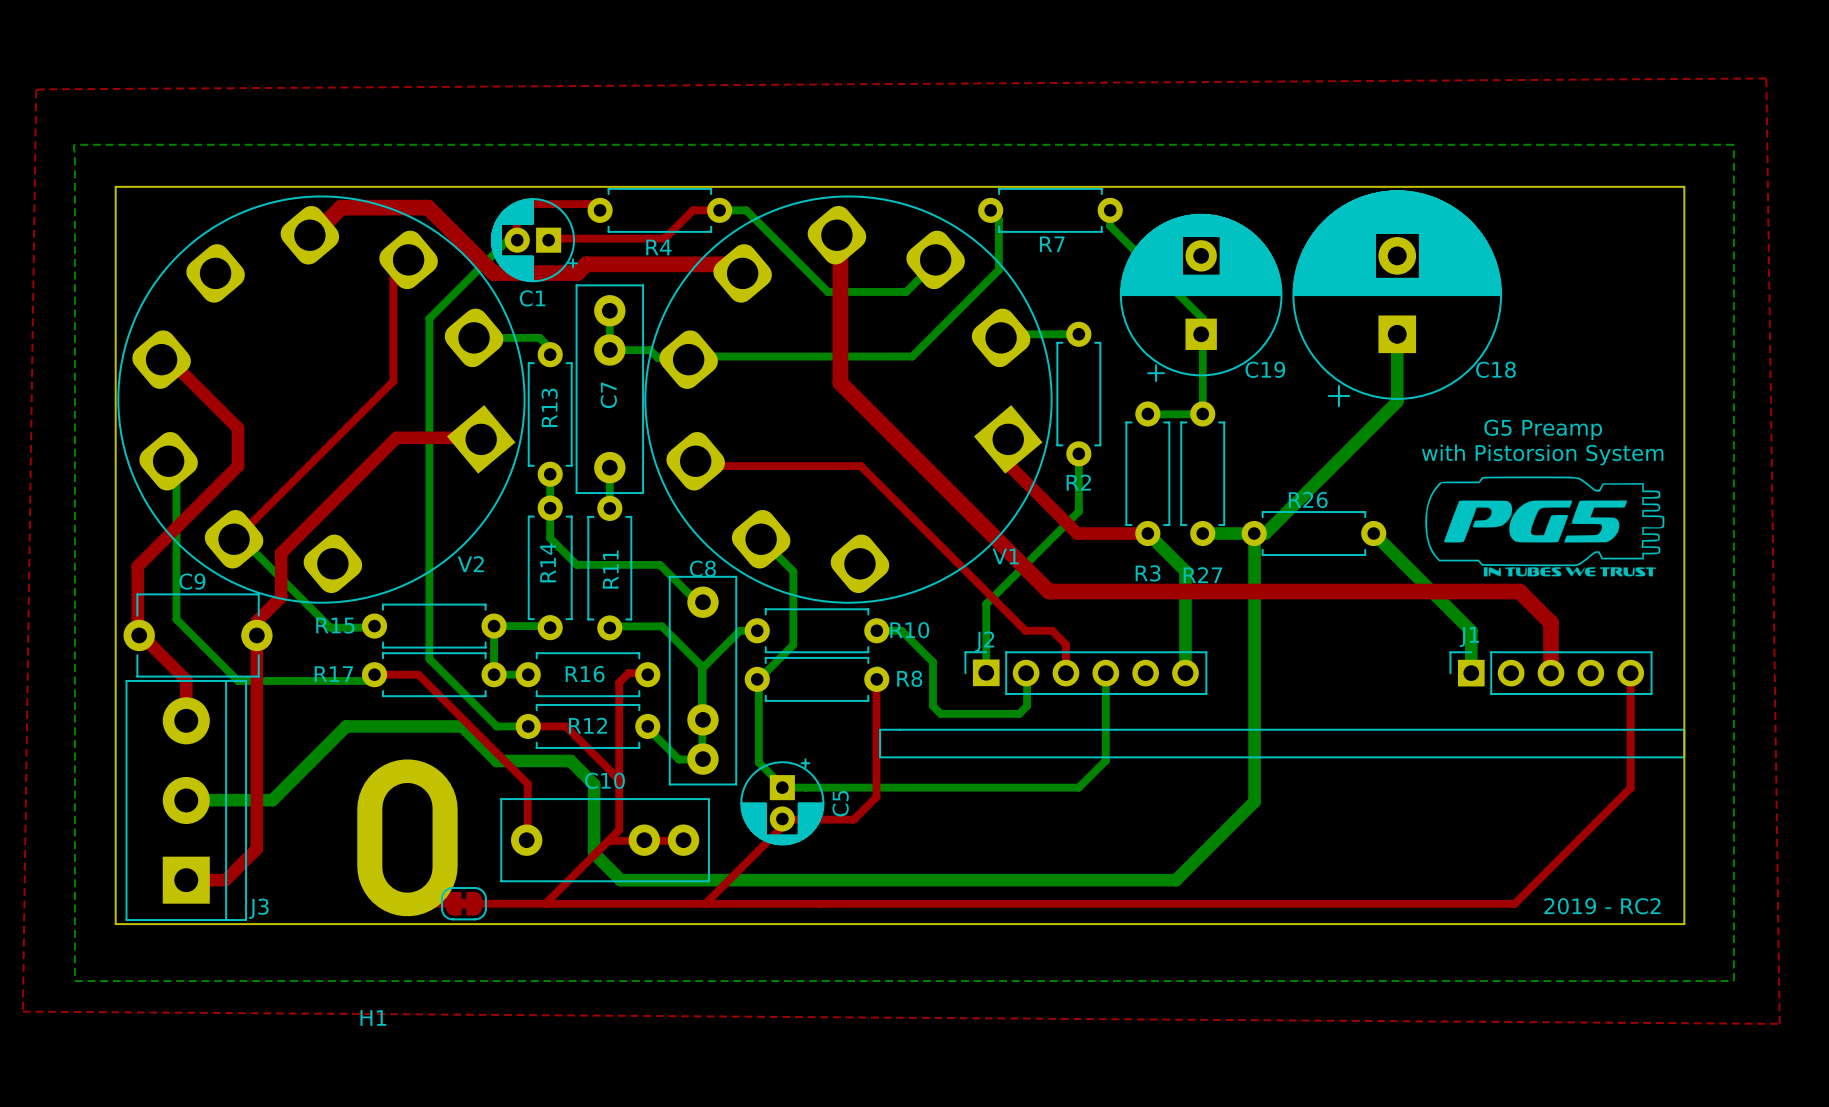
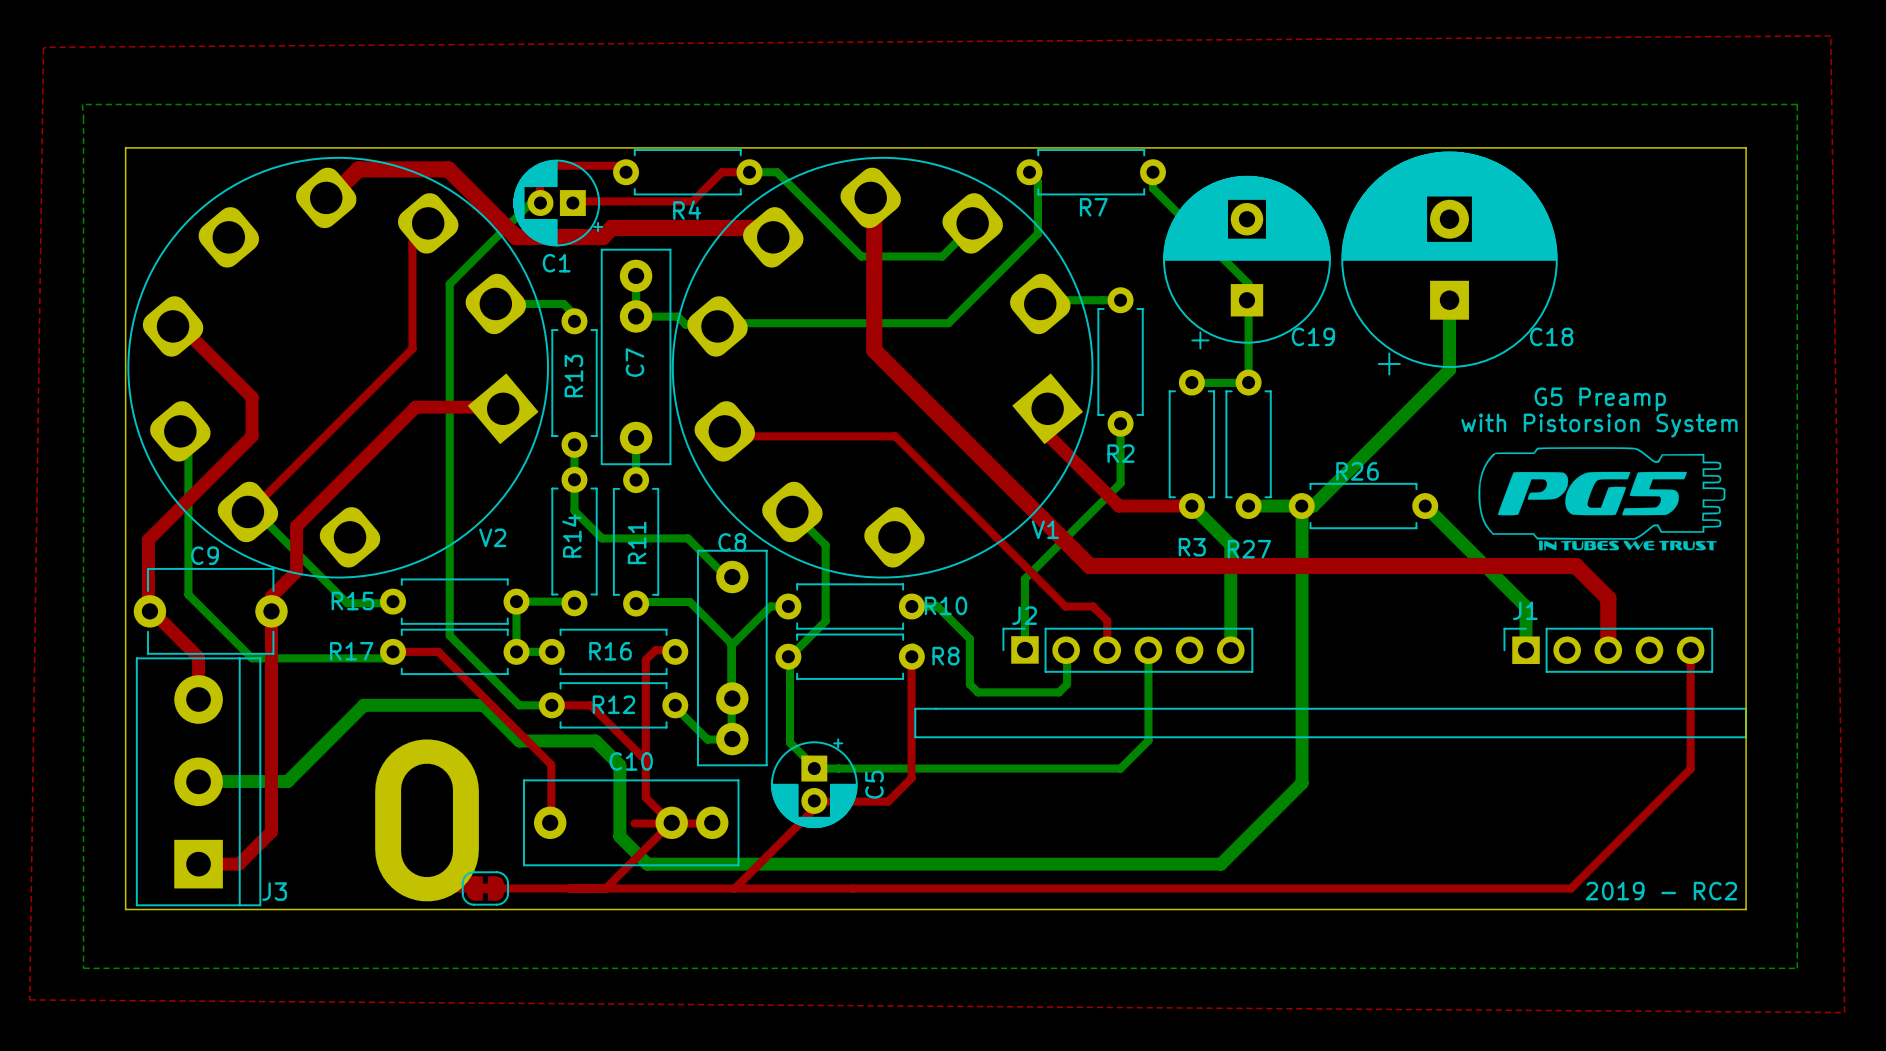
top track: (619, 815) (619, 829) (545, 903) -> (670, 823) (605, 888) (569, 888)
top track: none -> (645, 797) (671, 823)
H1 name: H1 (373, 1017) -> none

